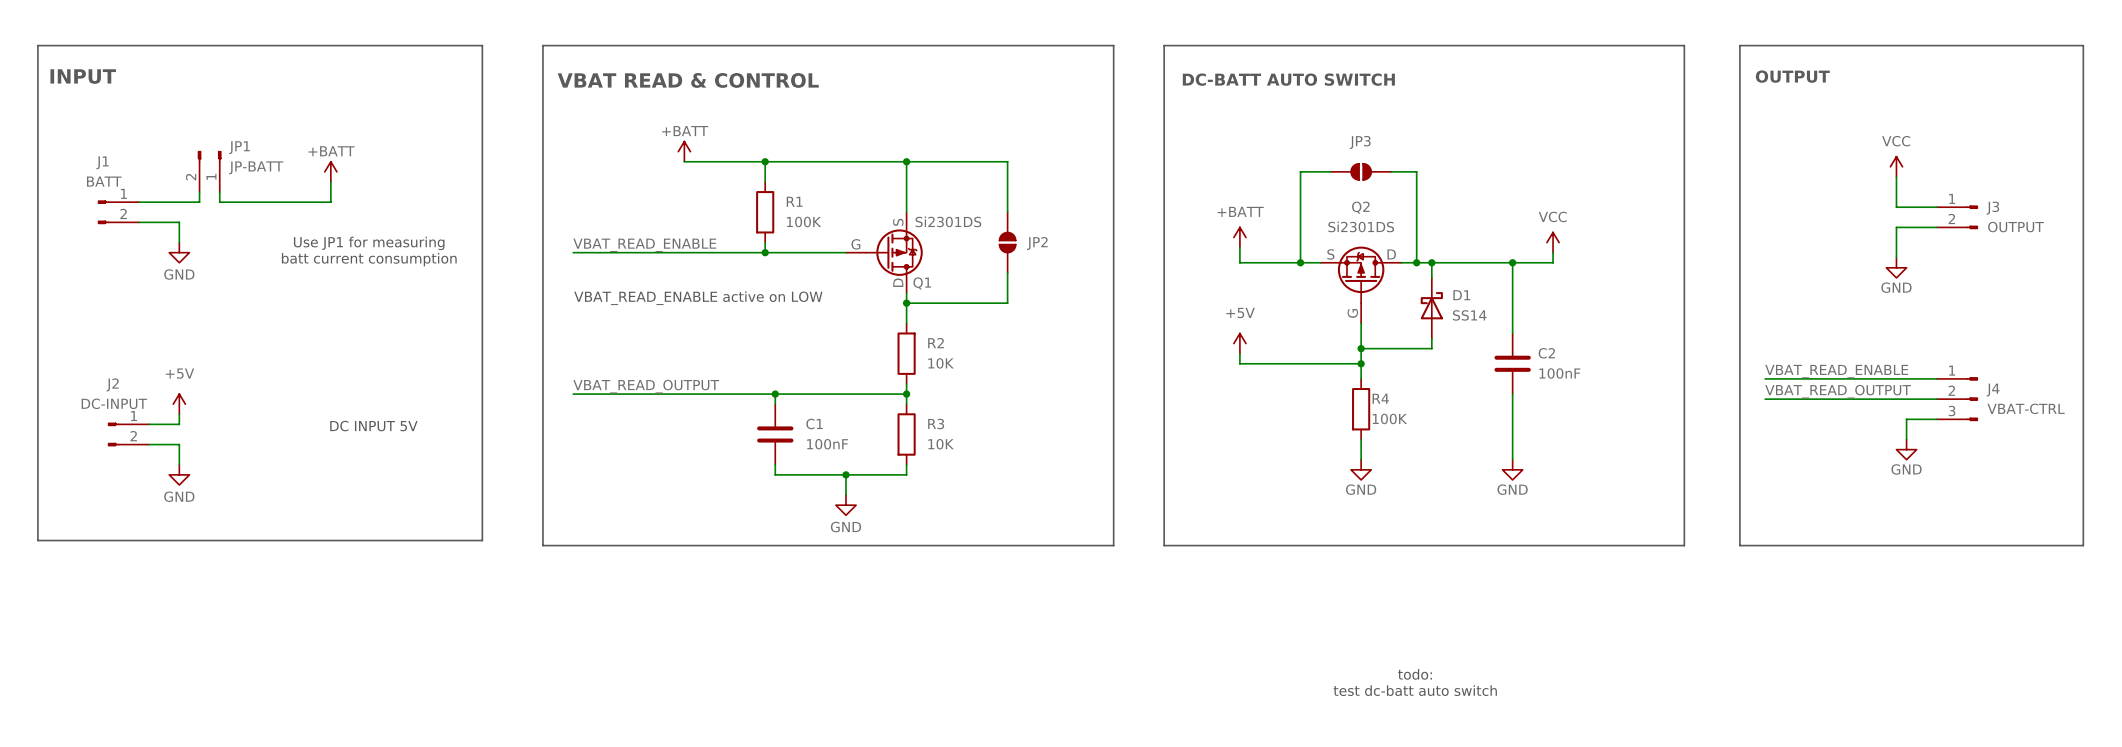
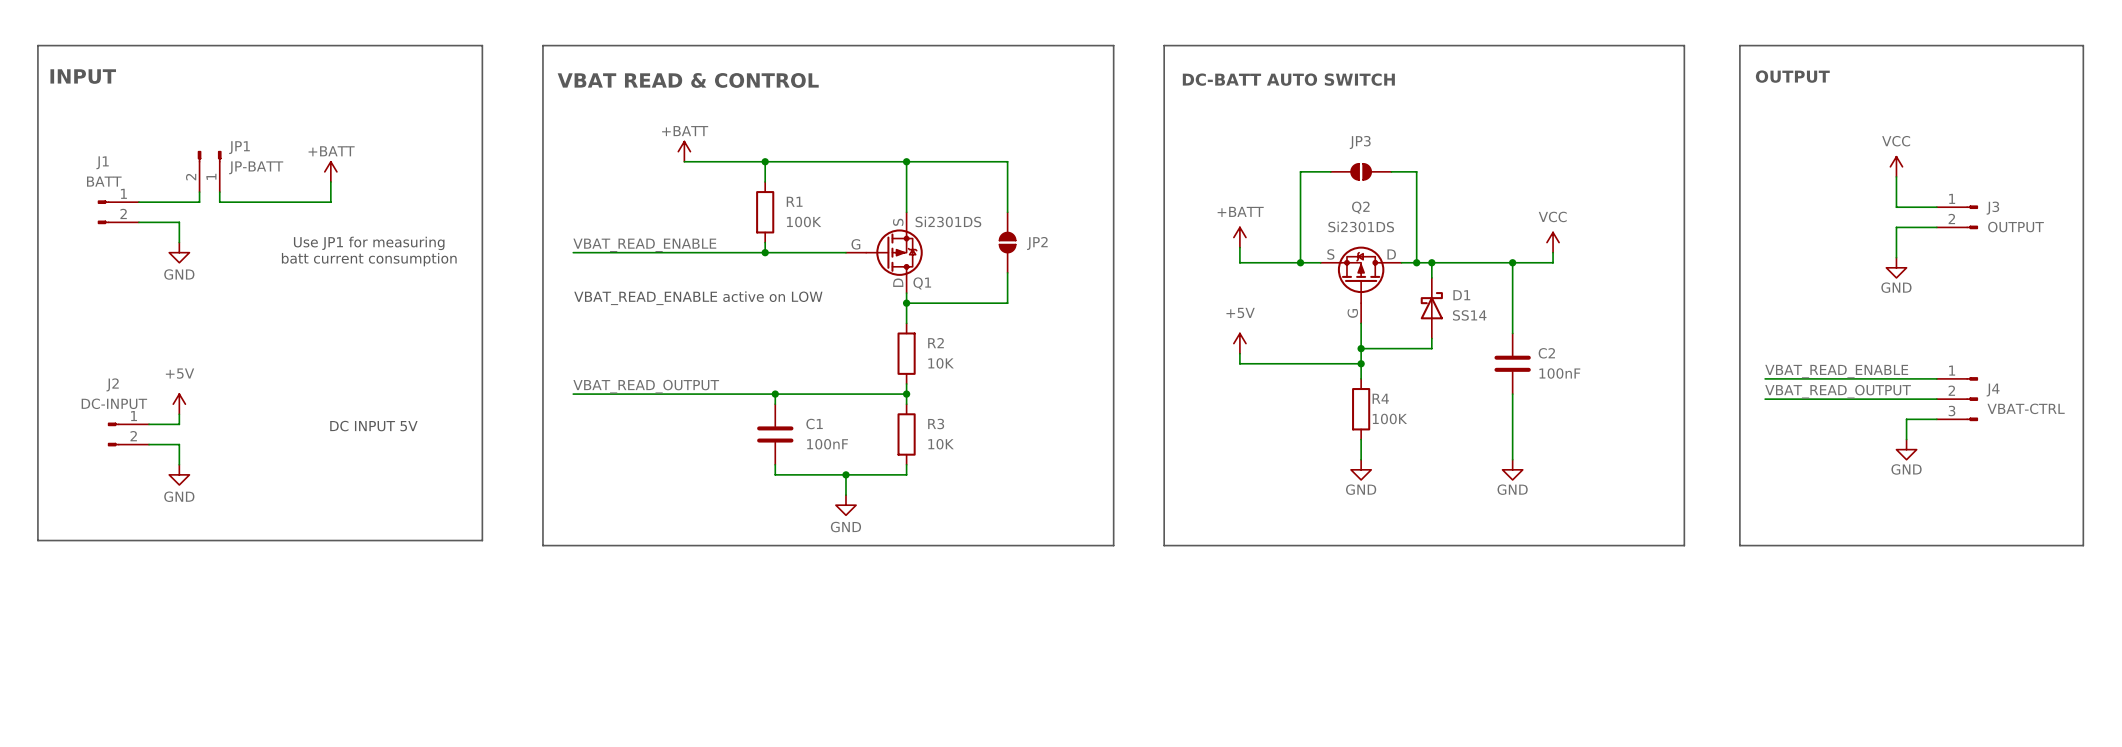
text: todo: (1415, 674) -> none
text: test dc-batt auto switch (1415, 690) -> none

